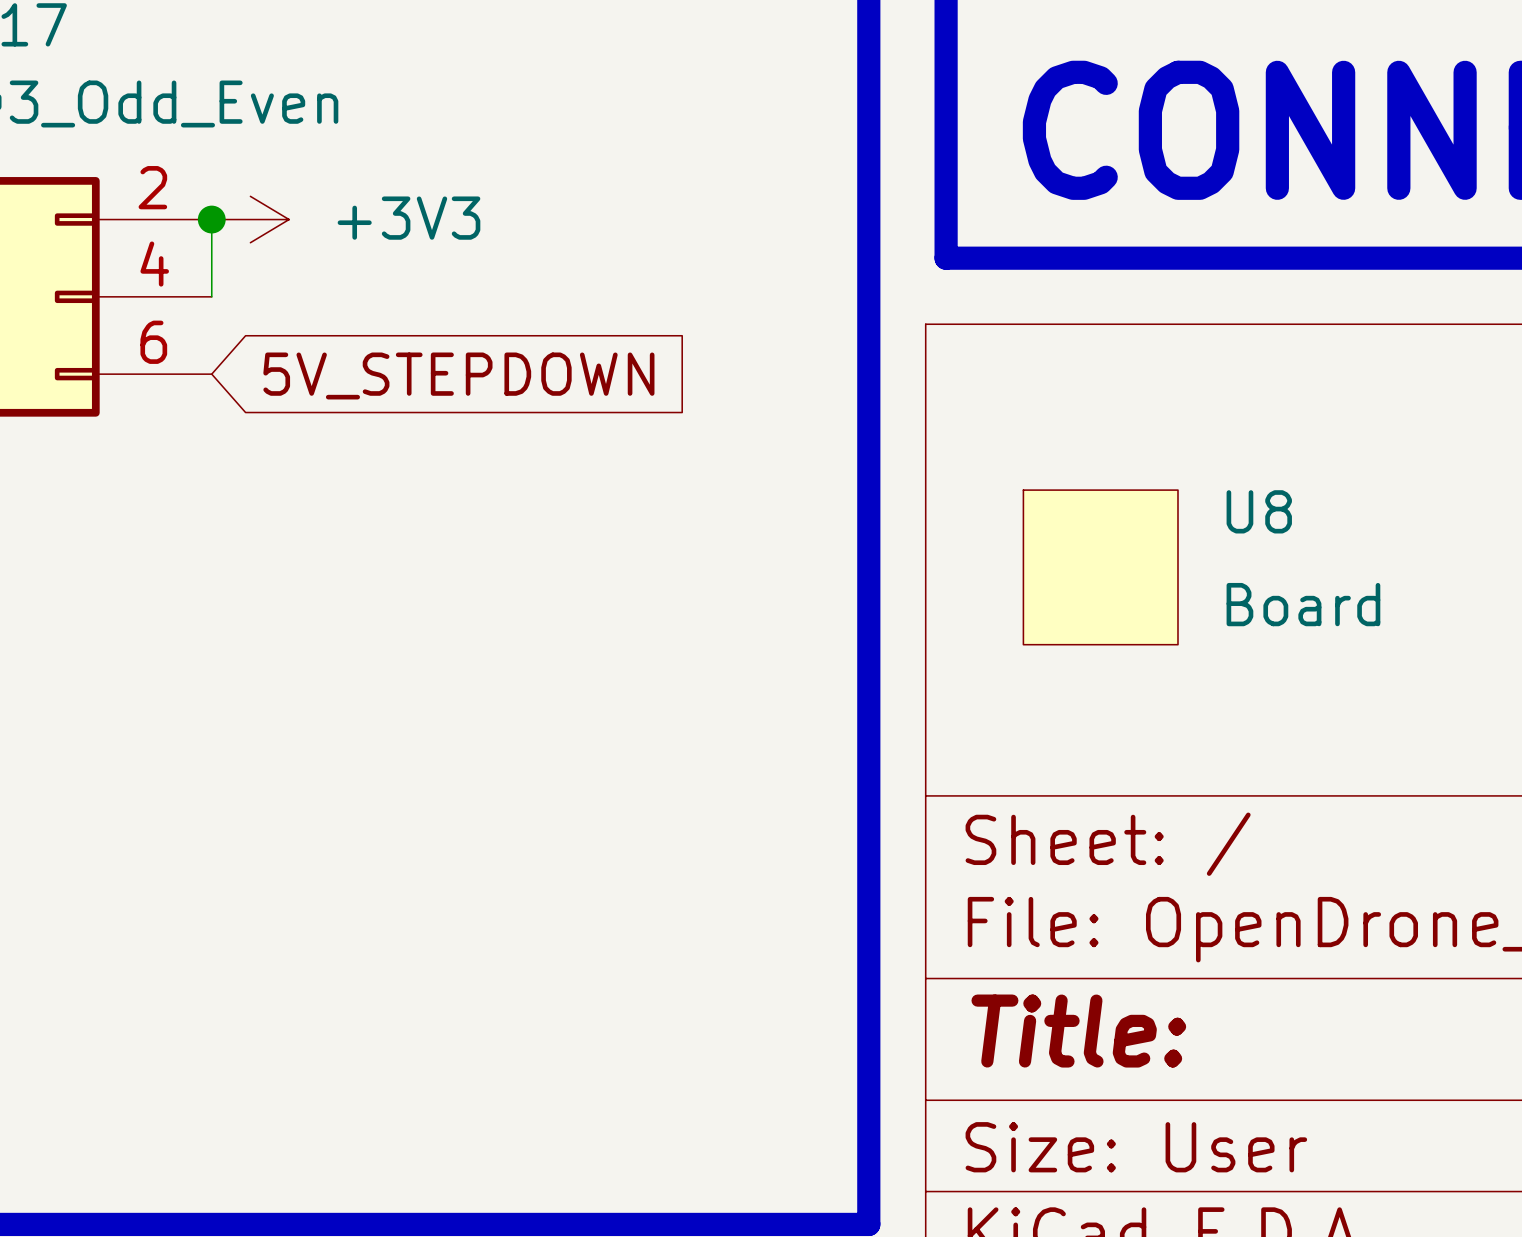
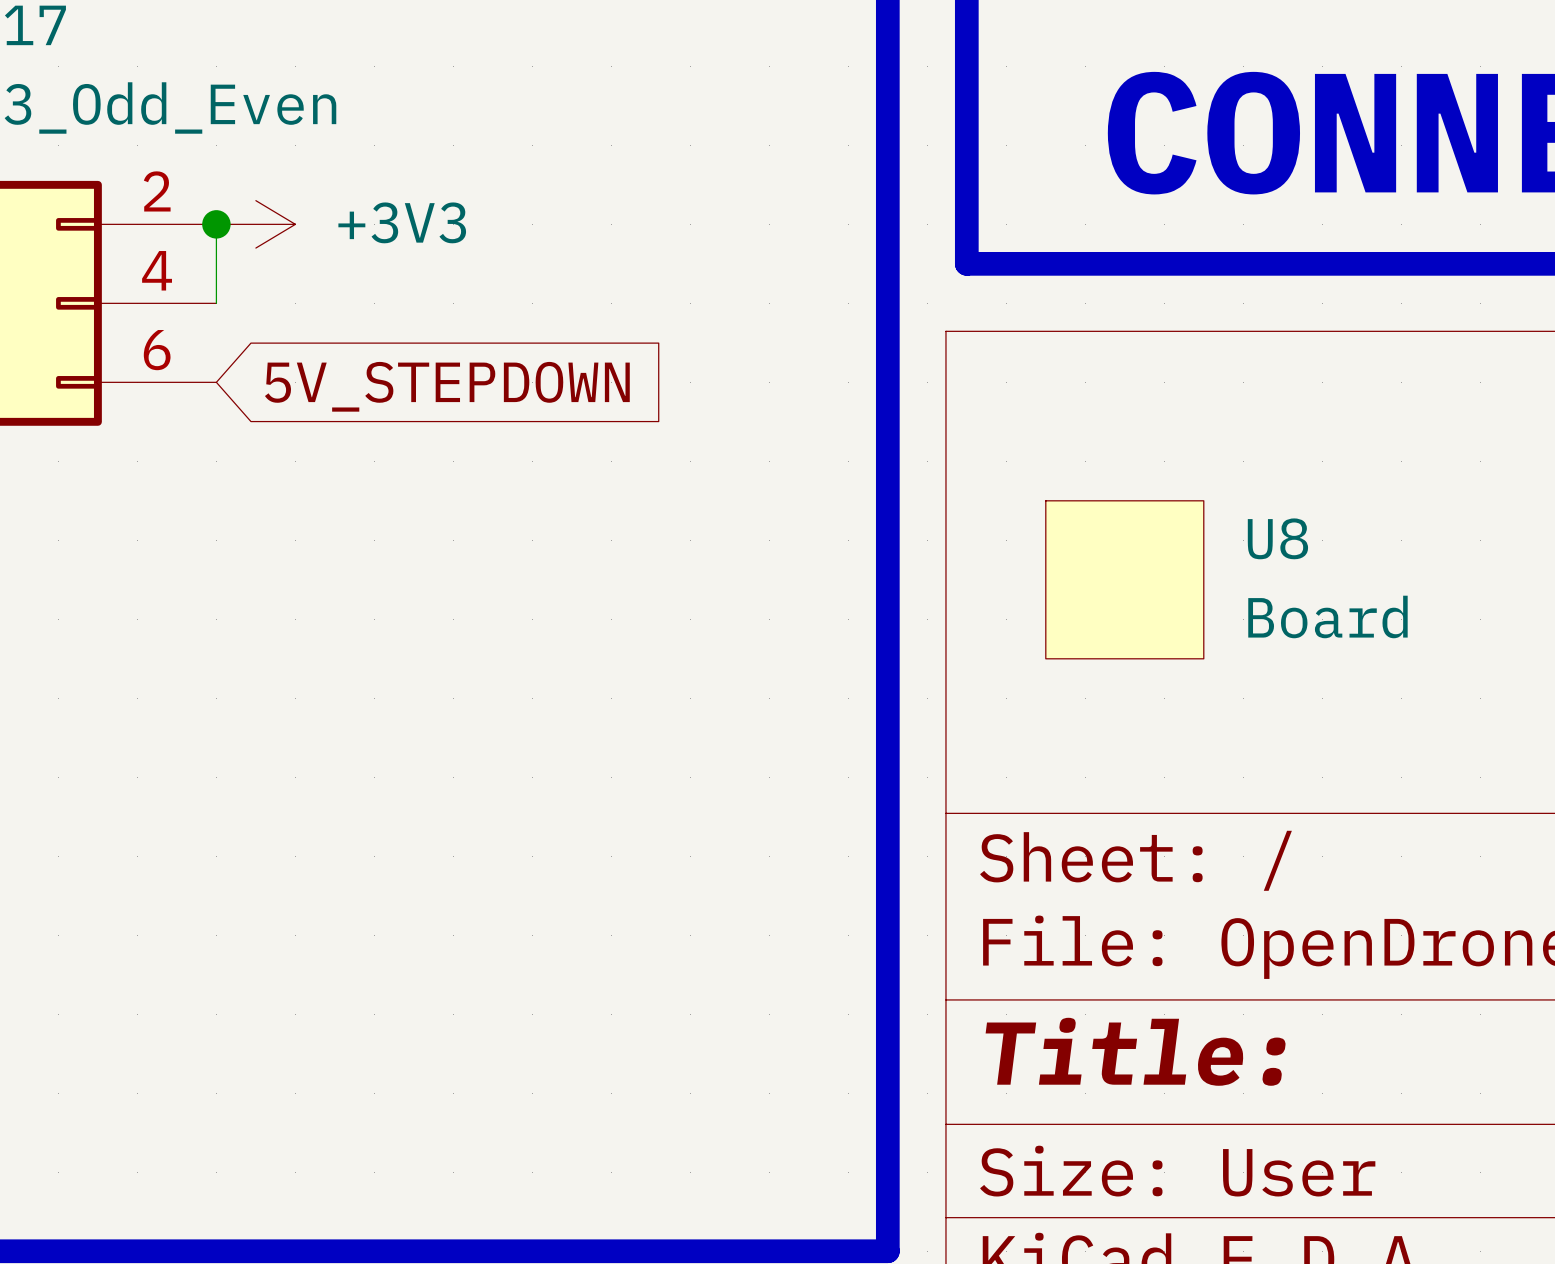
U8 name position: U8 (1259, 511) -> U8 (1277, 538)

